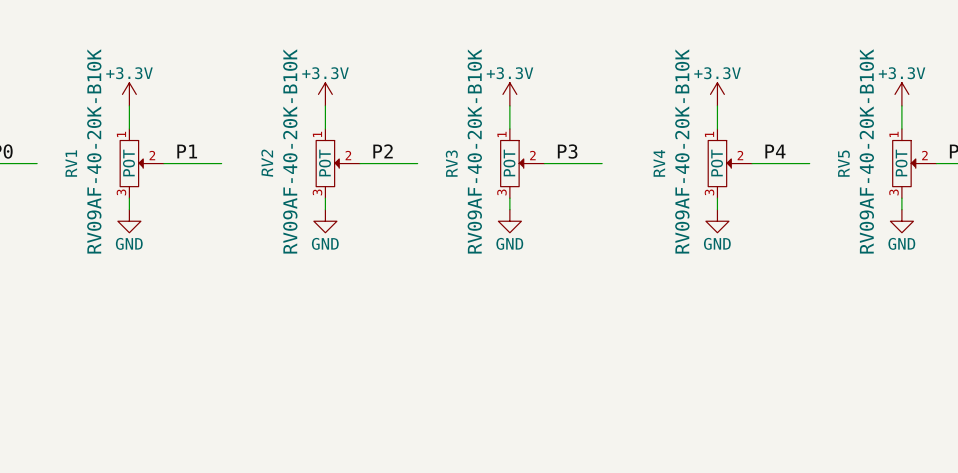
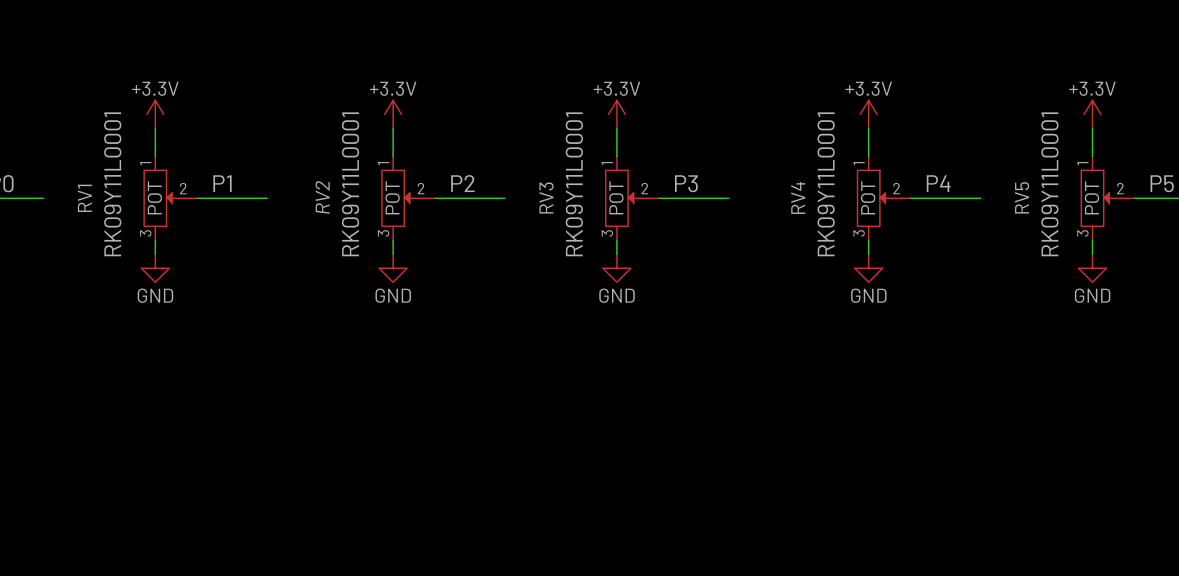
RV1 text: RV09AF-40-20K-B10K (94, 151) -> RK09Y11L0001 (112, 184)
RV2 text: RV09AF-40-20K-B10K (290, 151) -> RK09Y11L0001 (350, 184)
RV3 text: RV09AF-40-20K-B10K (474, 151) -> RK09Y11L0001 (574, 184)
RV4 text: RV09AF-40-20K-B10K (682, 151) -> RK09Y11L0001 (826, 184)
RV5 text: RV09AF-40-20K-B10K (866, 151) -> RK09Y11L0001 (1049, 184)

